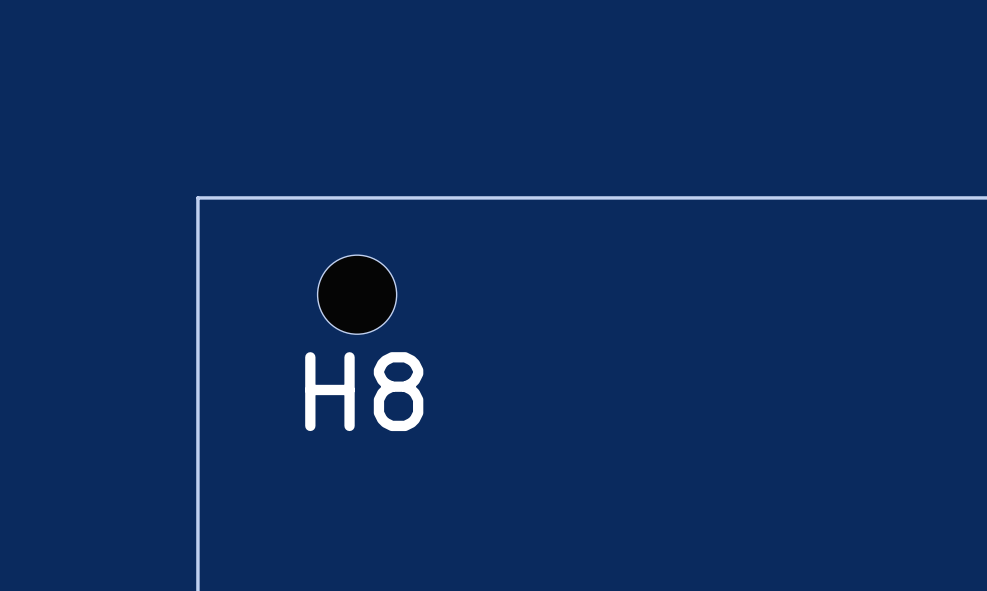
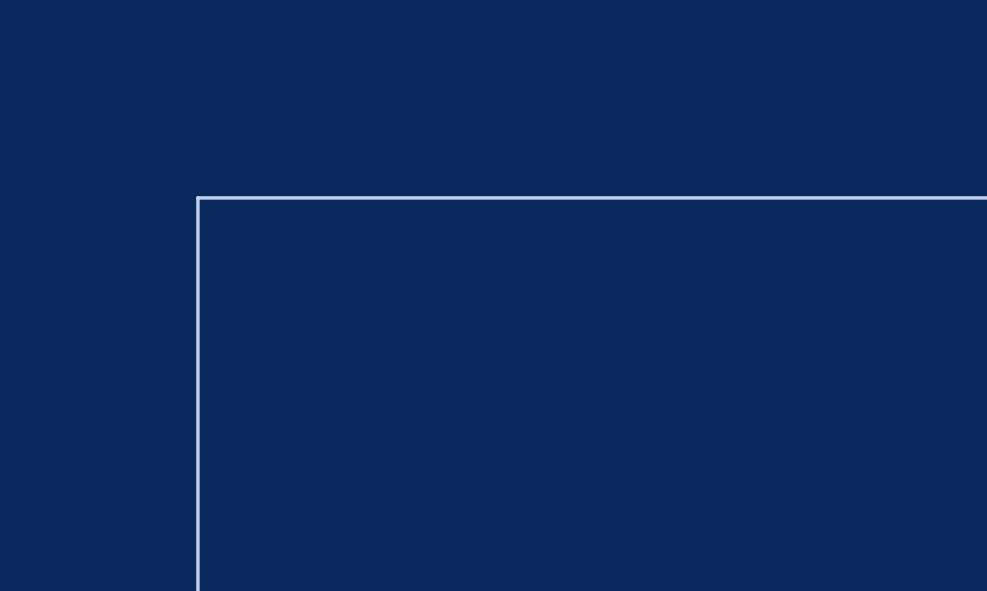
H8: (357, 294) -> none

